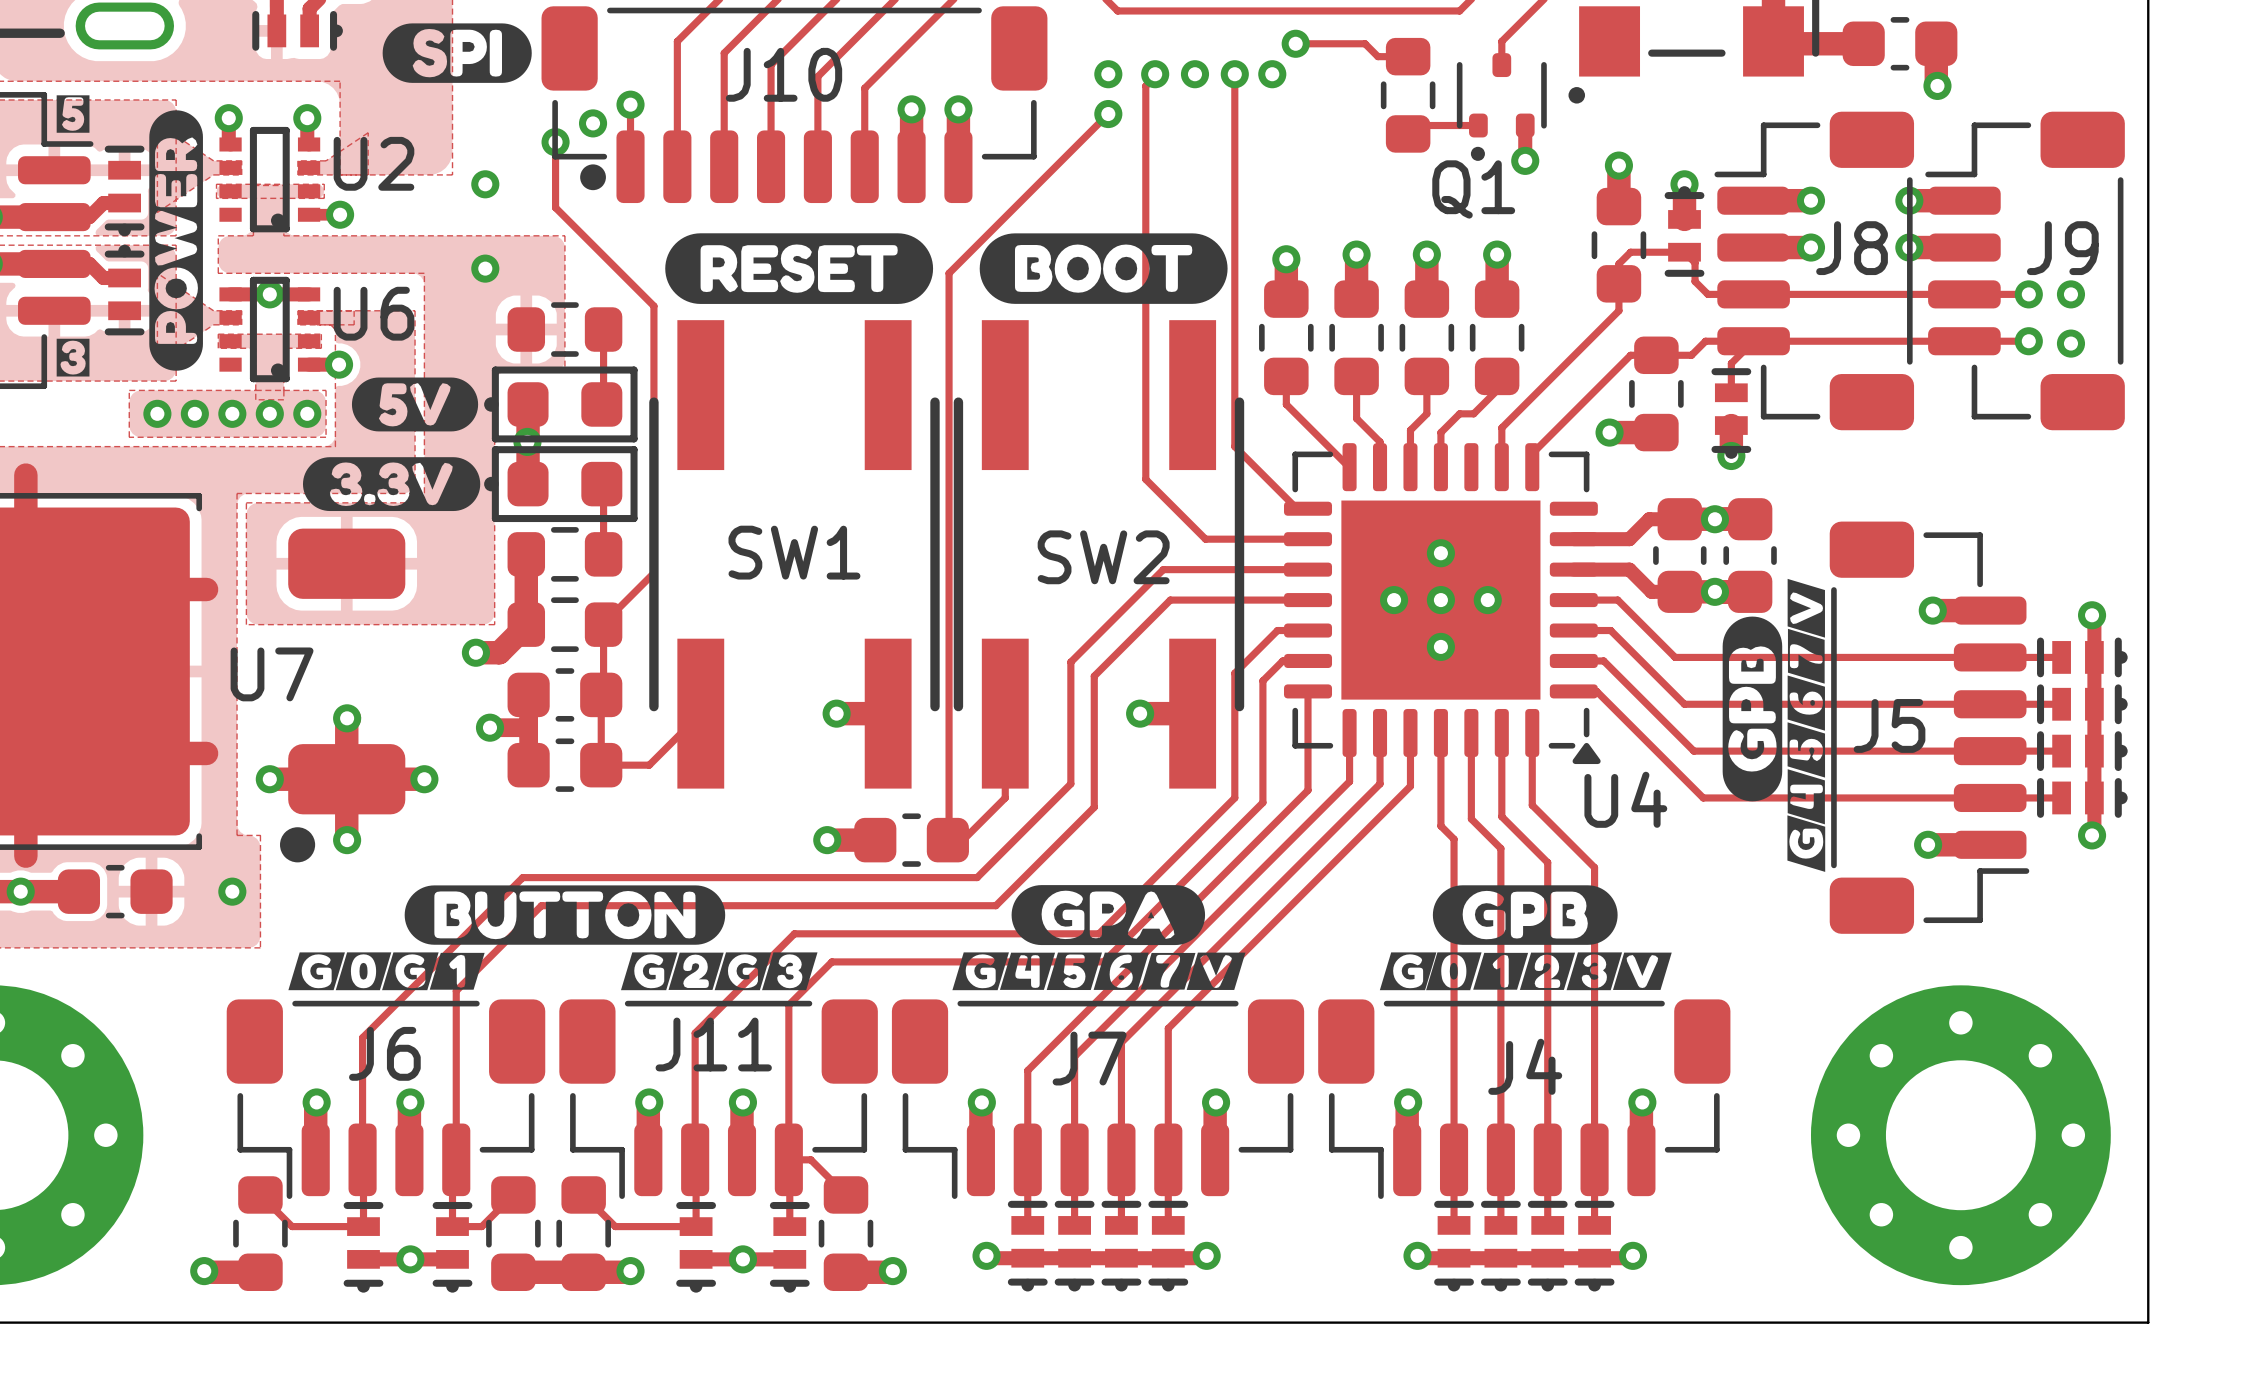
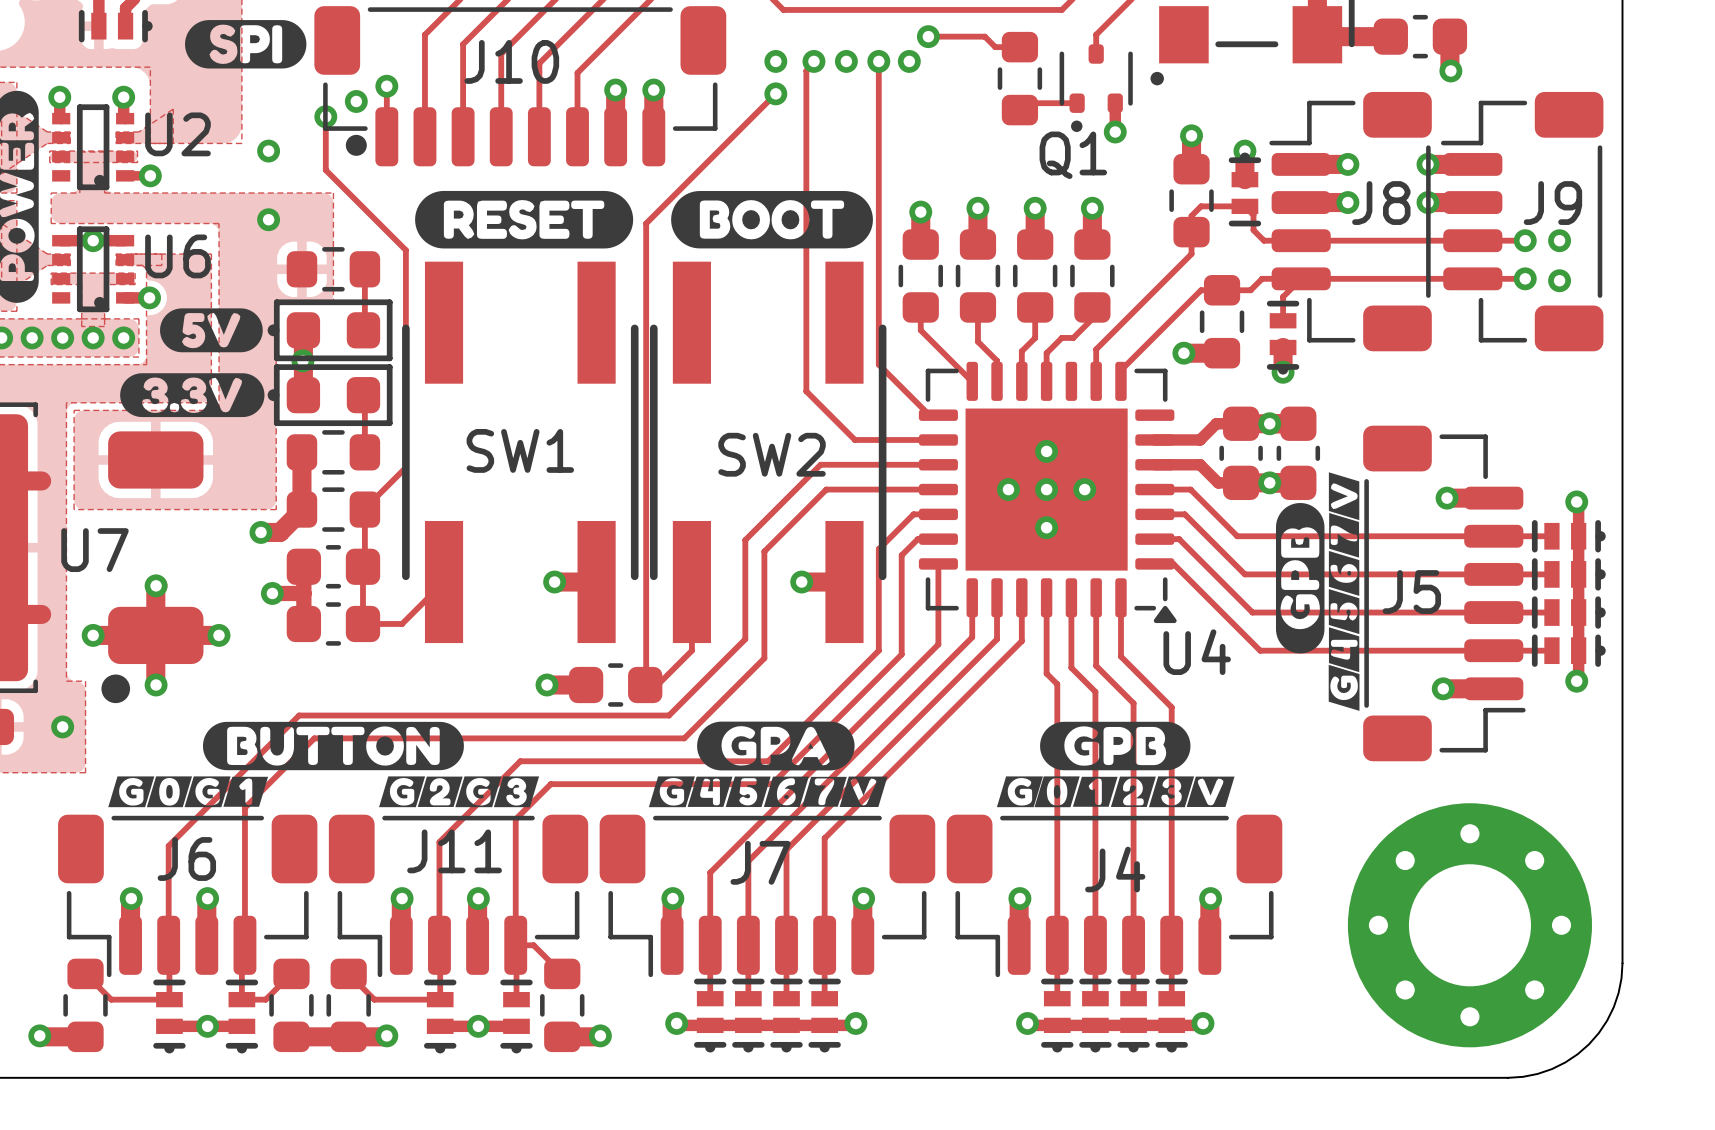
board edge: (2148, 1182) (2148, 1322) (2007, 1322) -> (1622, 963) (1621, 978) (1613, 1007) (1607, 1020) (1588, 1044) (1565, 1062) (1551, 1069) (1523, 1076) (1508, 1077)

